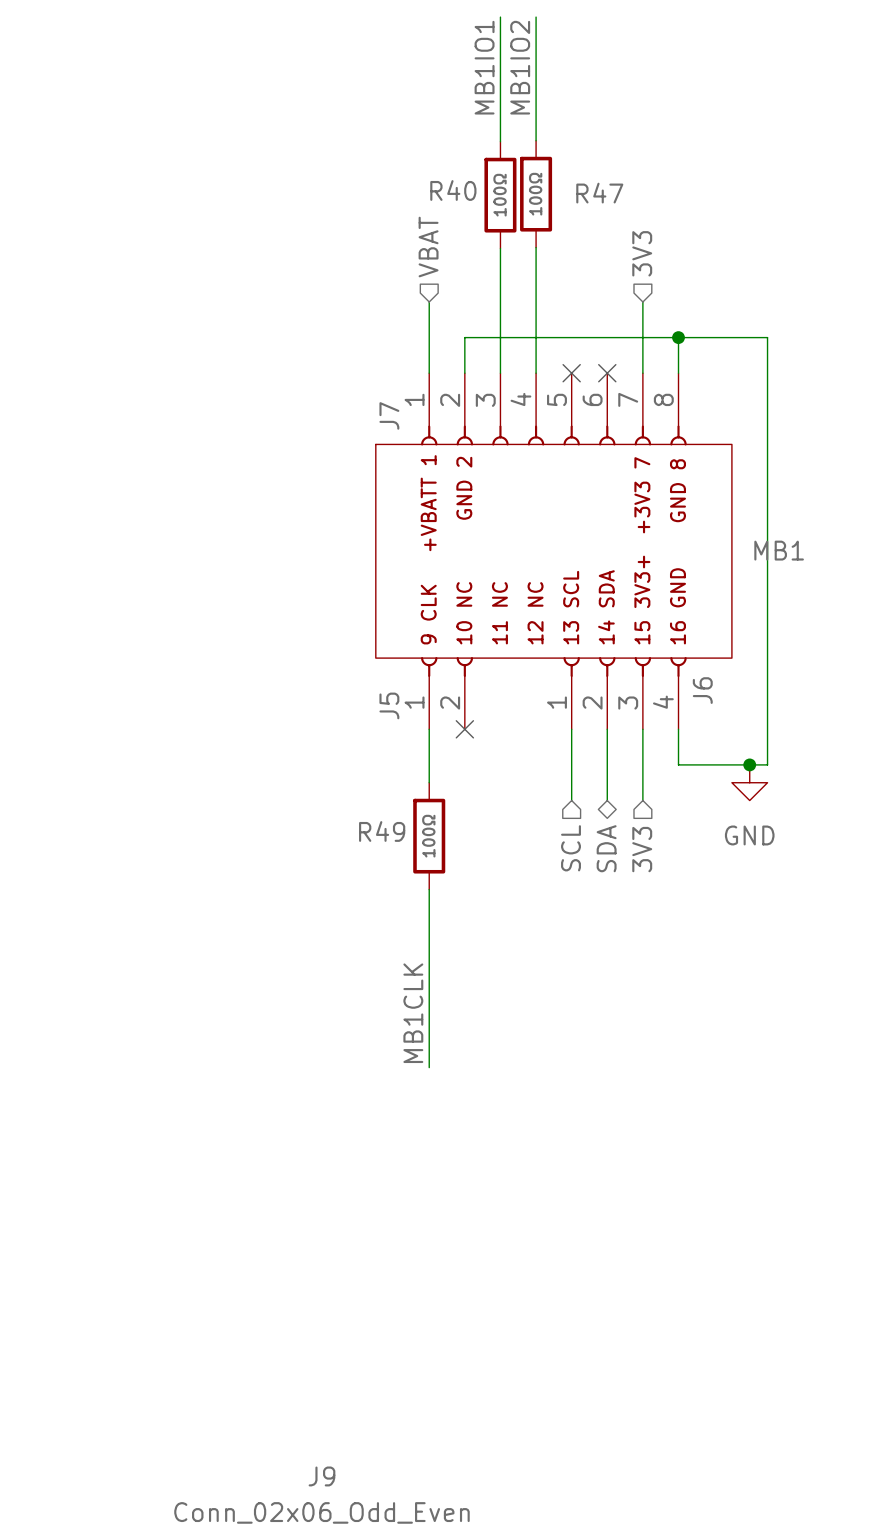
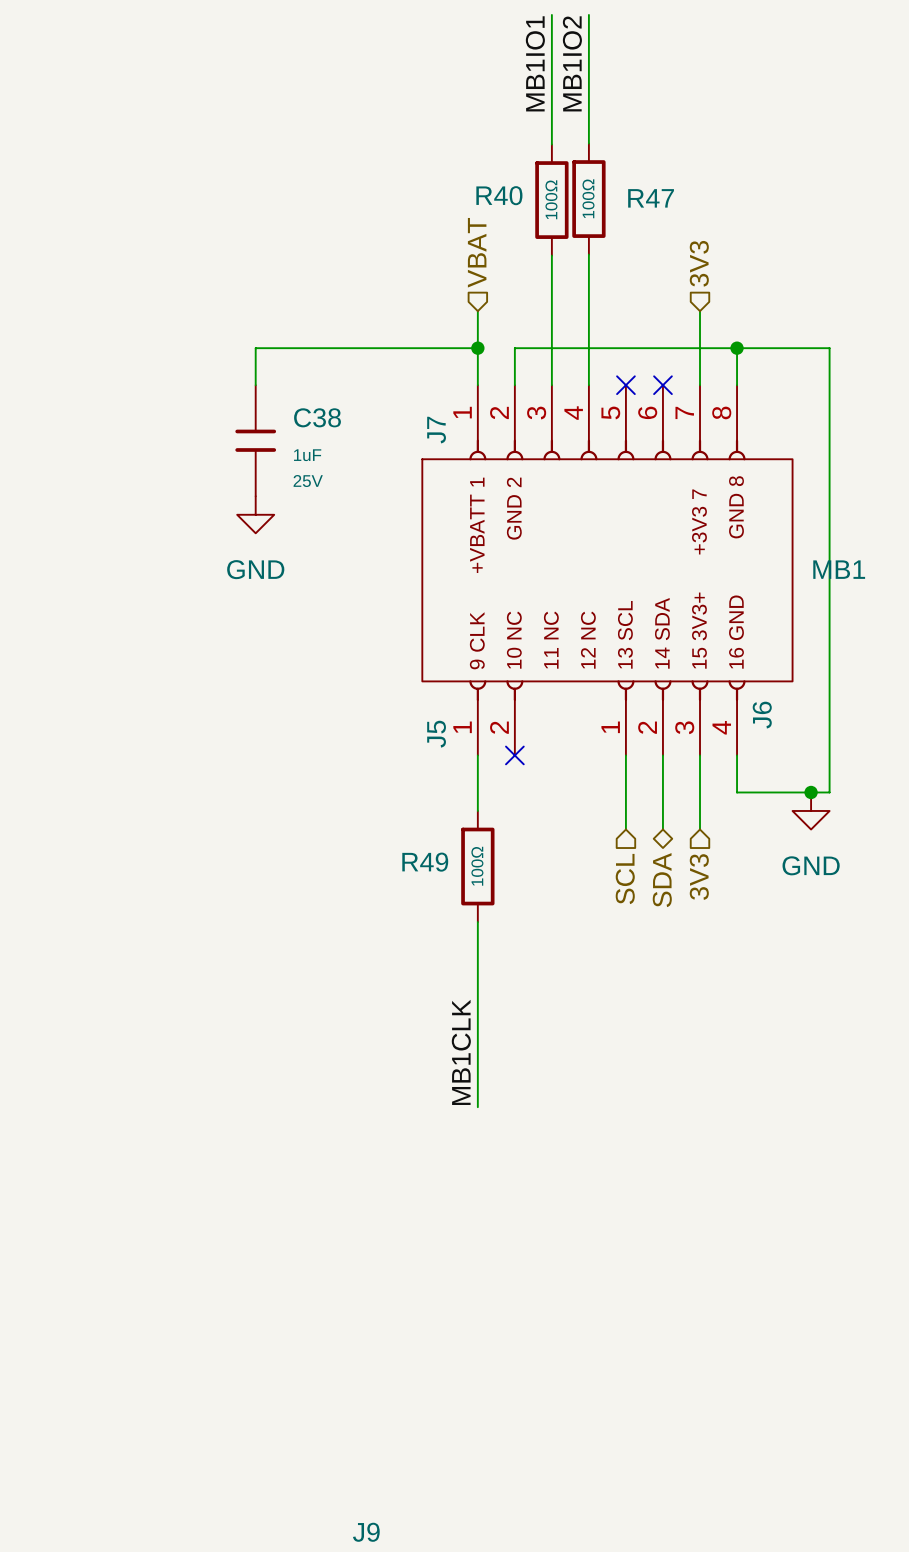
wire: none -> (477, 348) (255, 348) (255, 385)
junction: none -> (477, 348)
C38: none -> 1uF (255, 440)
power symbol: none -> GND (255, 514)

